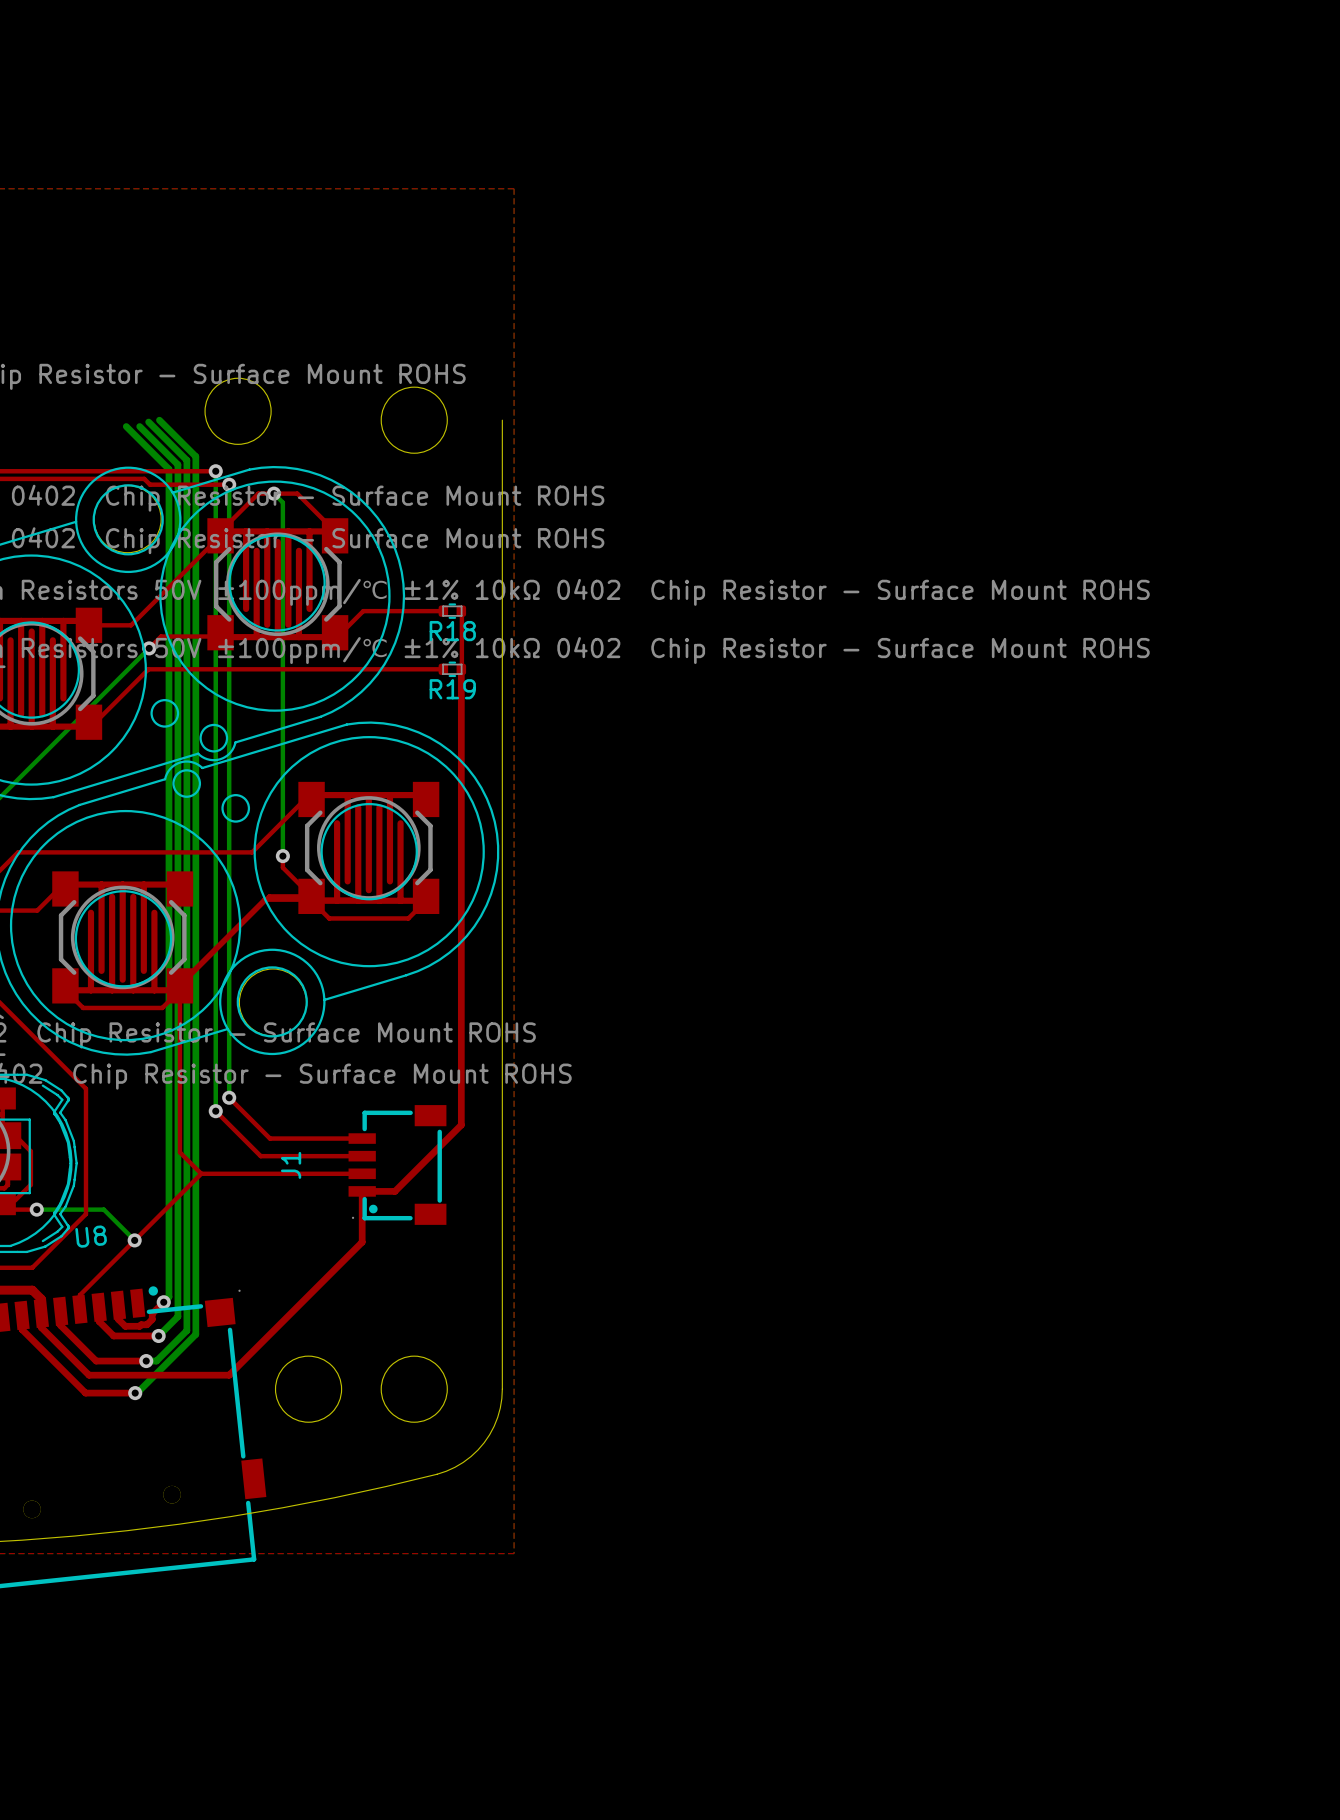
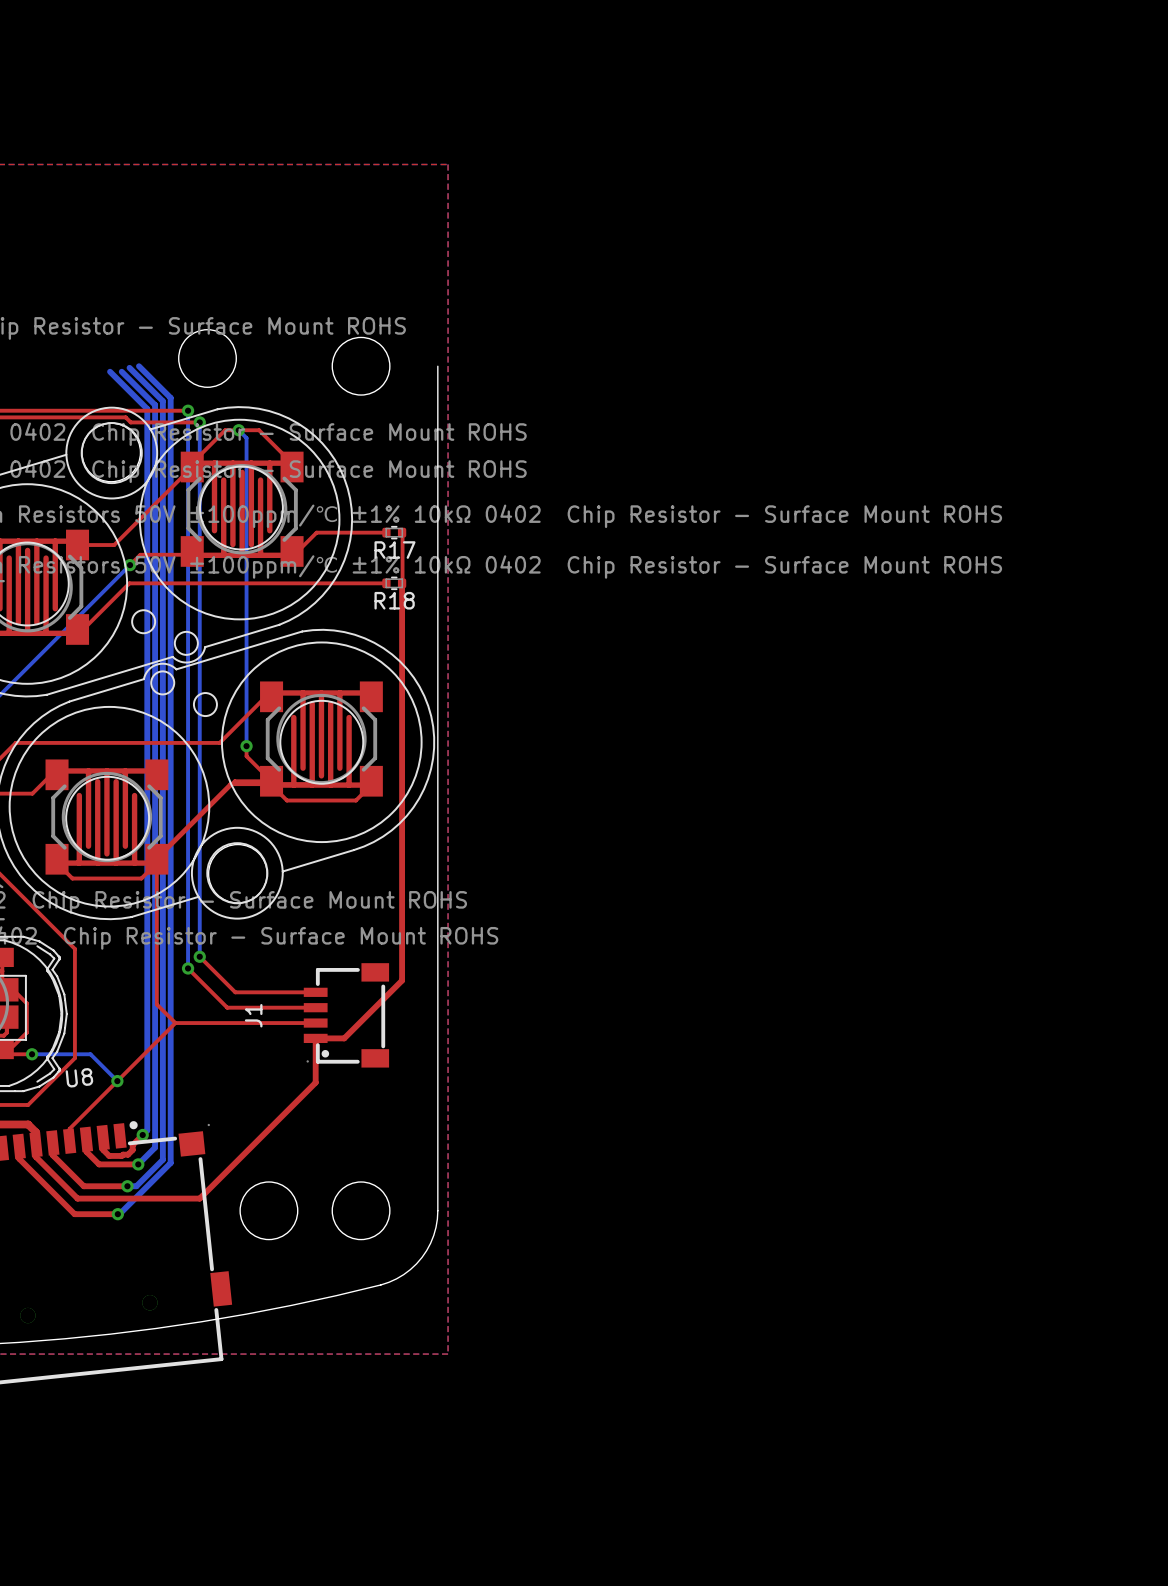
R18 name: R18 (452, 631) -> R17 (394, 550)
R19 name: R19 (452, 689) -> R18 (394, 600)

